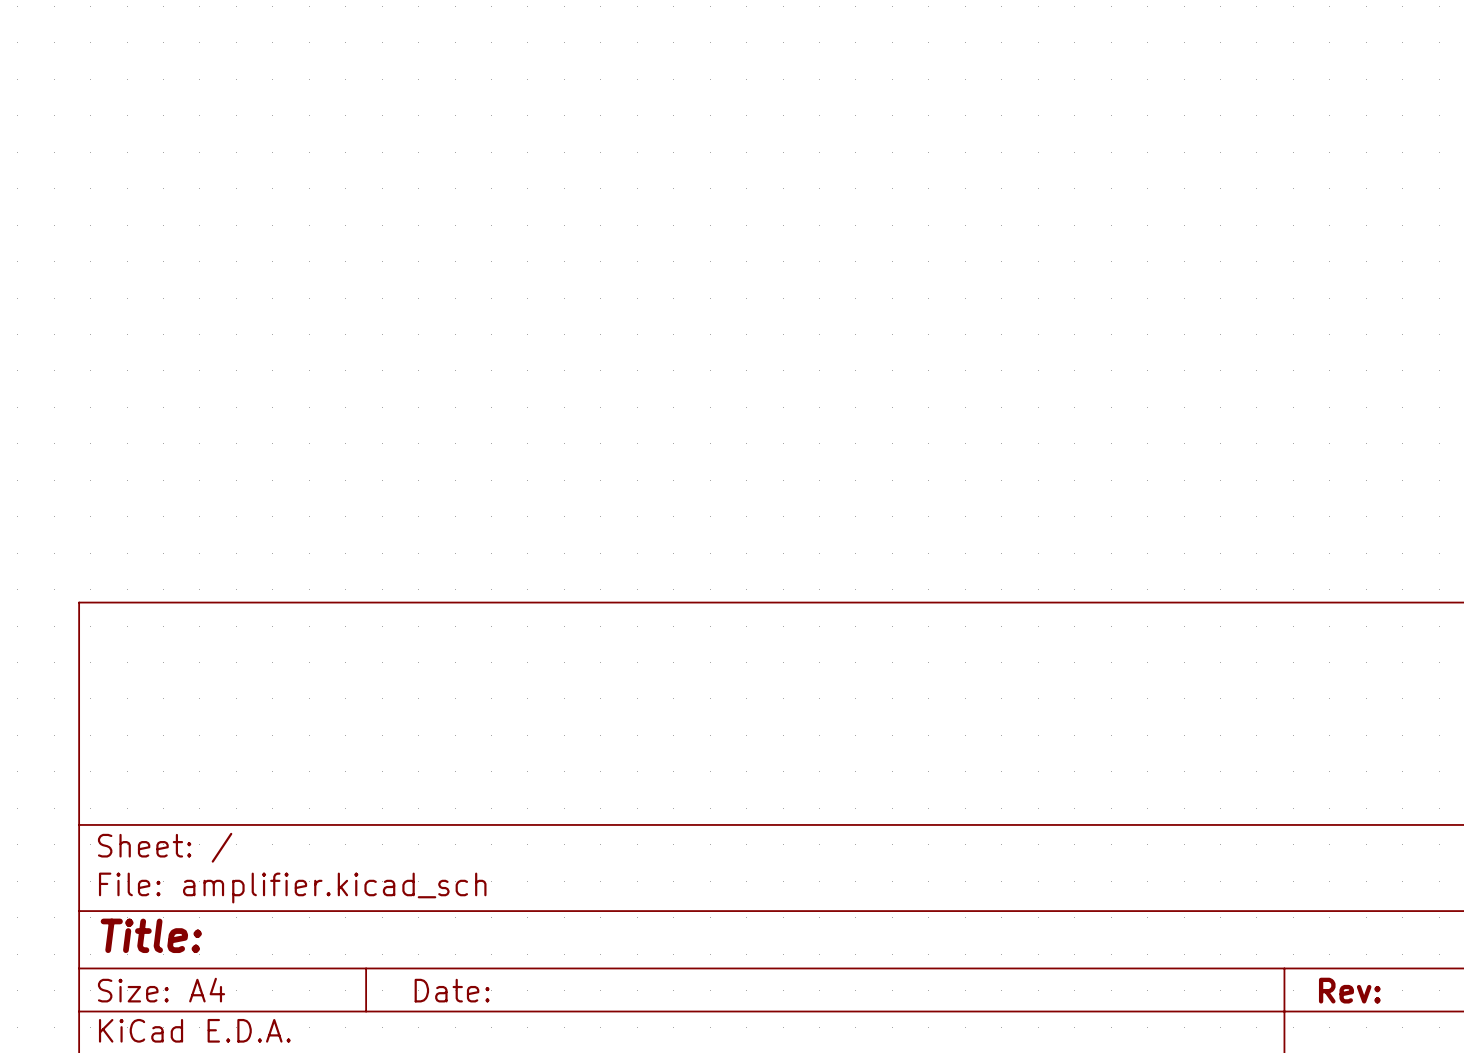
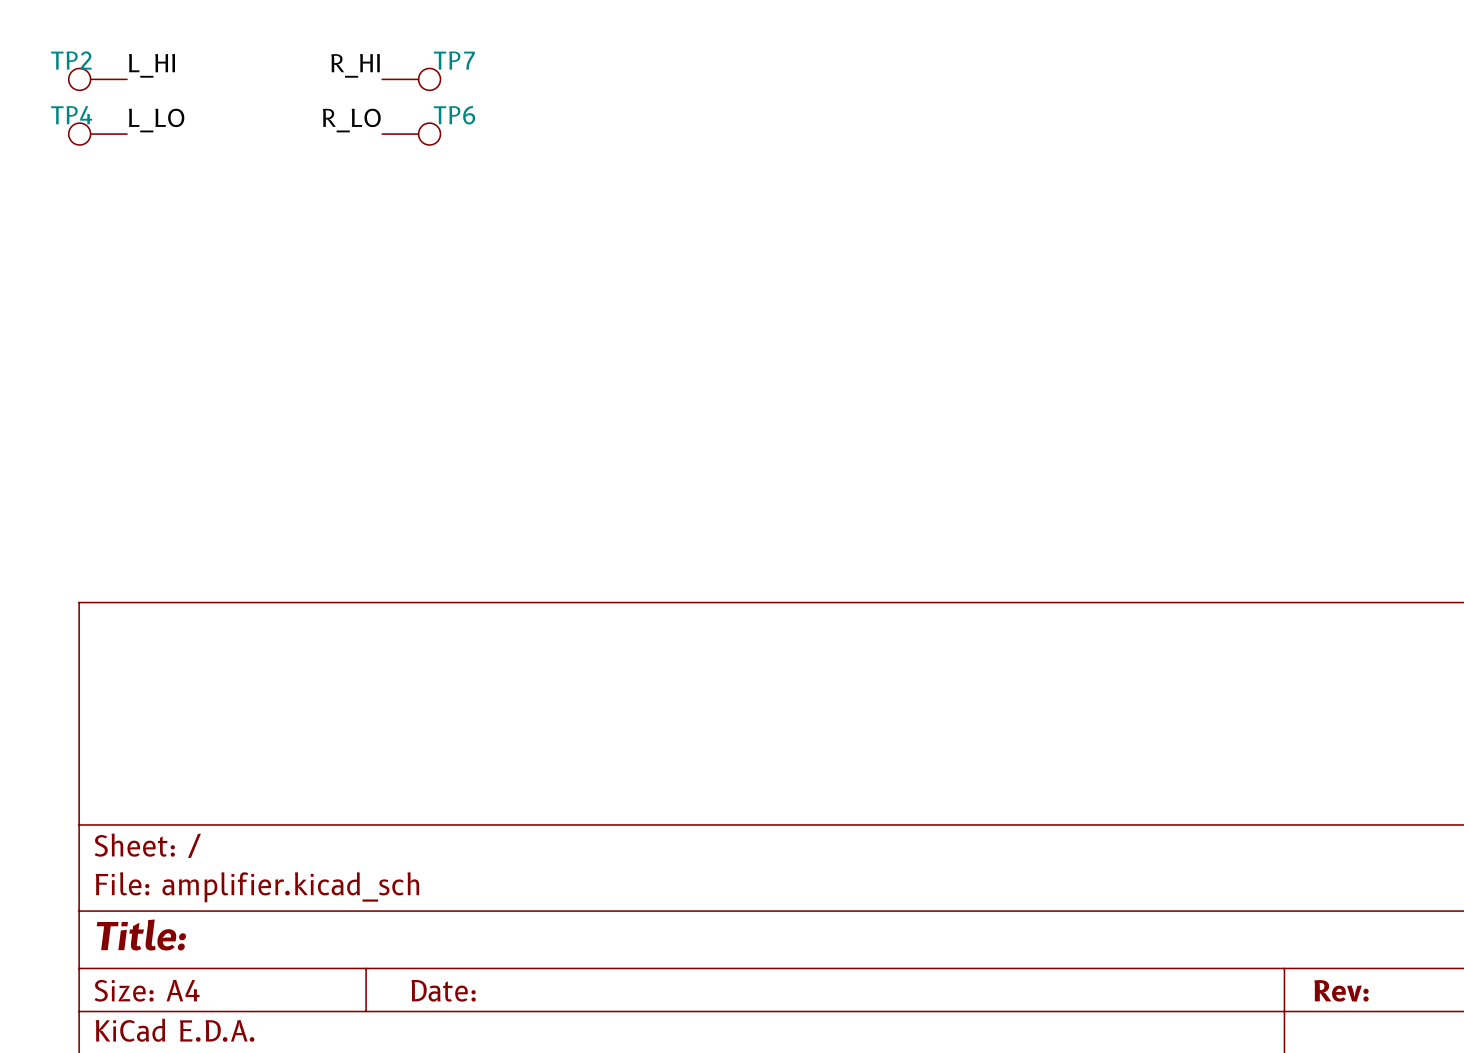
label: none -> L_HI (151, 65)
label: none -> R_HI (355, 65)
TP2: none -> (97, 79)
TP7: none -> (411, 79)
label: none -> L_LO (156, 120)
label: none -> R_LO (351, 120)
TP4: none -> (97, 134)
TP6: none -> (411, 134)

